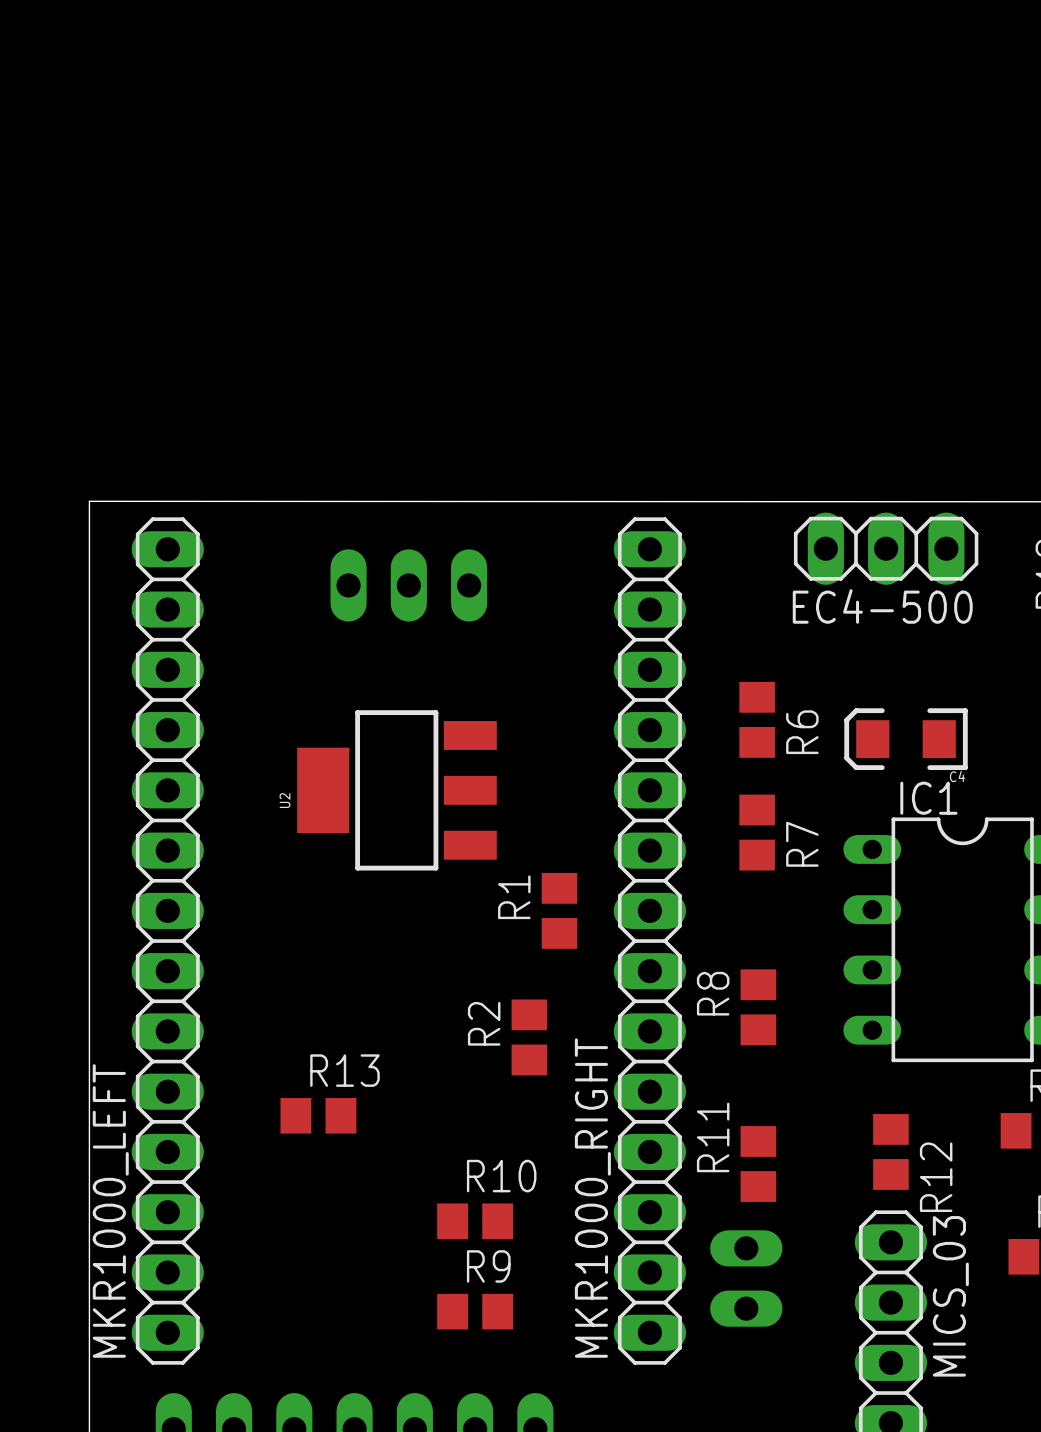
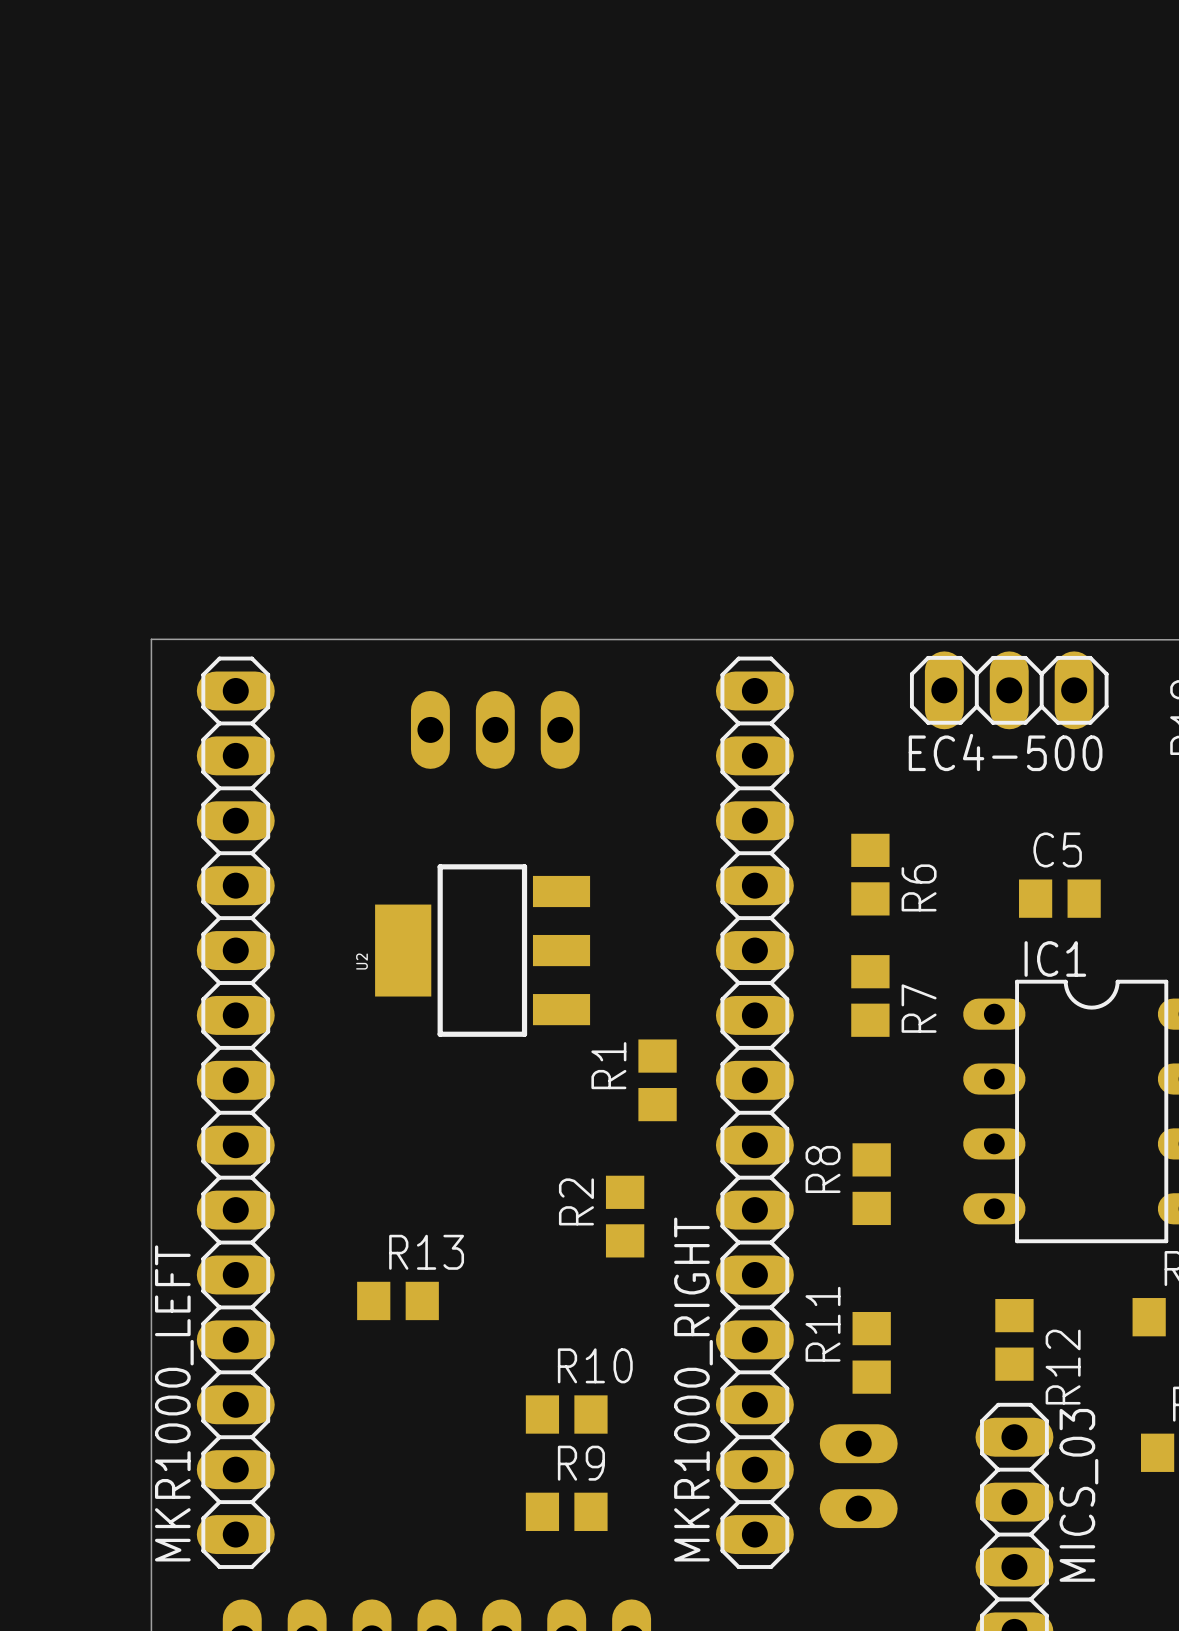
C4: (906, 739) -> none
C5: none -> (1059, 898)

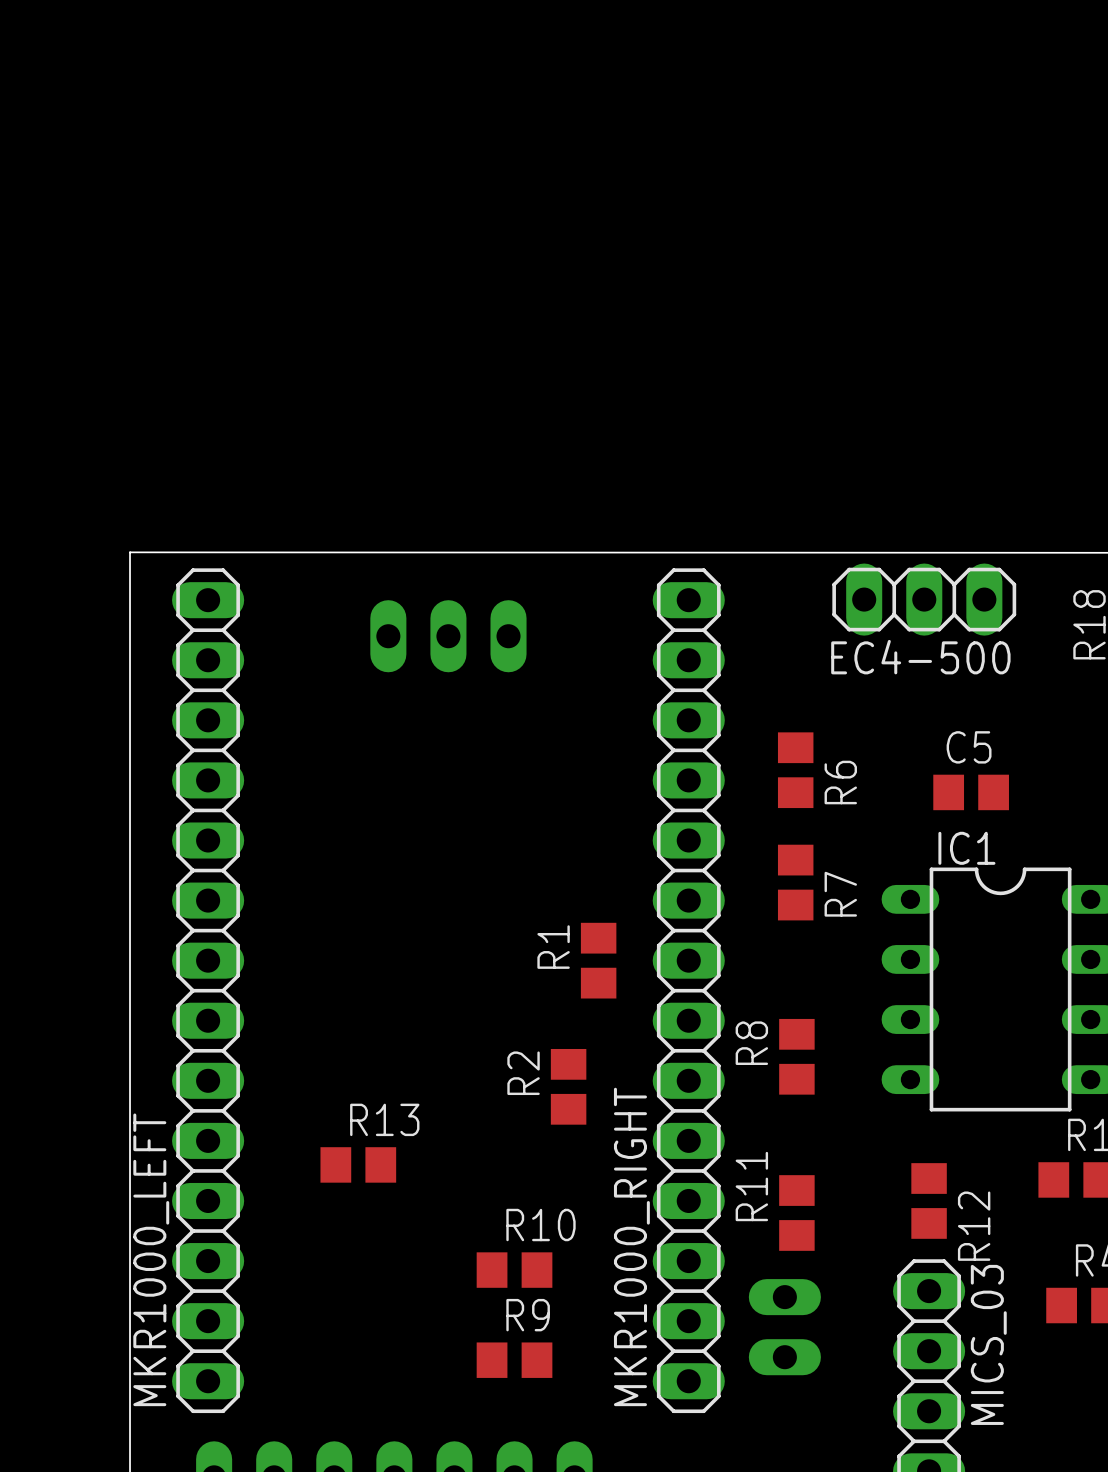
U2: (482, 950) -> none

